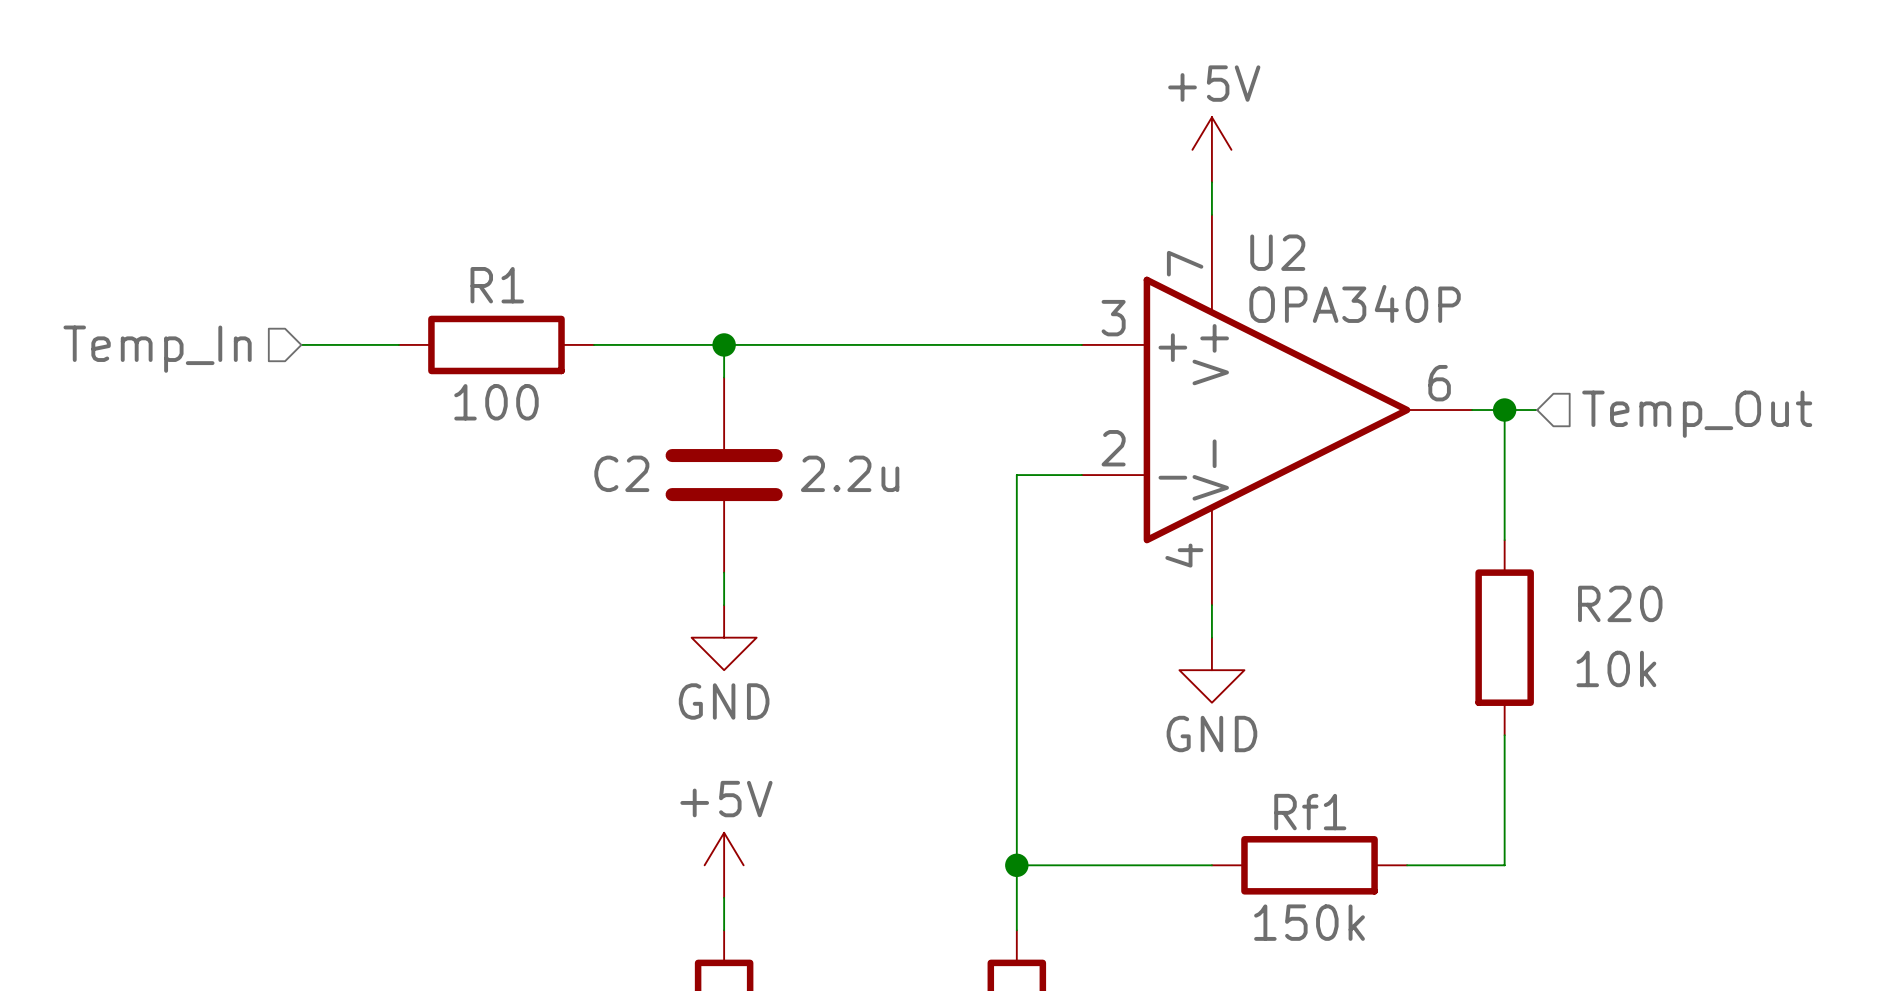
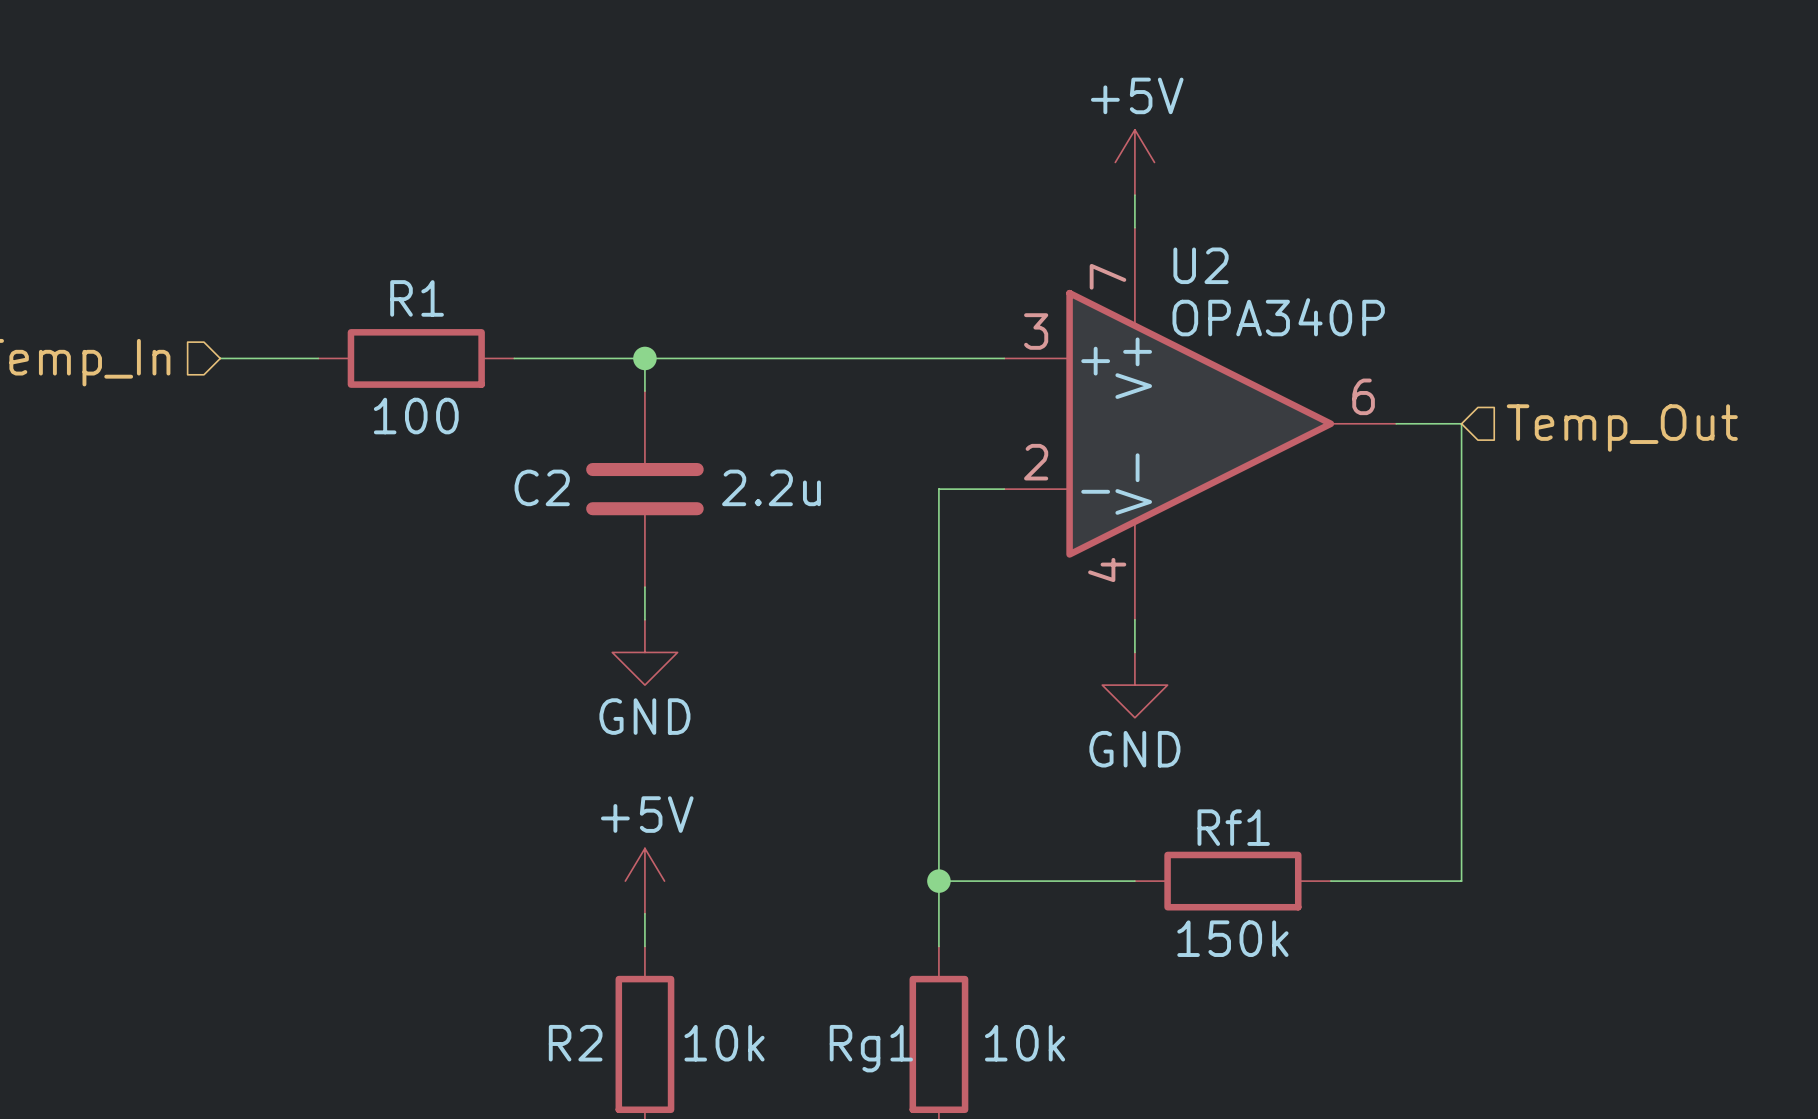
wire: (1504, 410) (1504, 540) -> none
junction: (1504, 410) -> none
R20: 10k (1504, 637) -> none
wire: (1504, 735) (1504, 865) -> (1461, 423) (1461, 881) (1428, 881)

